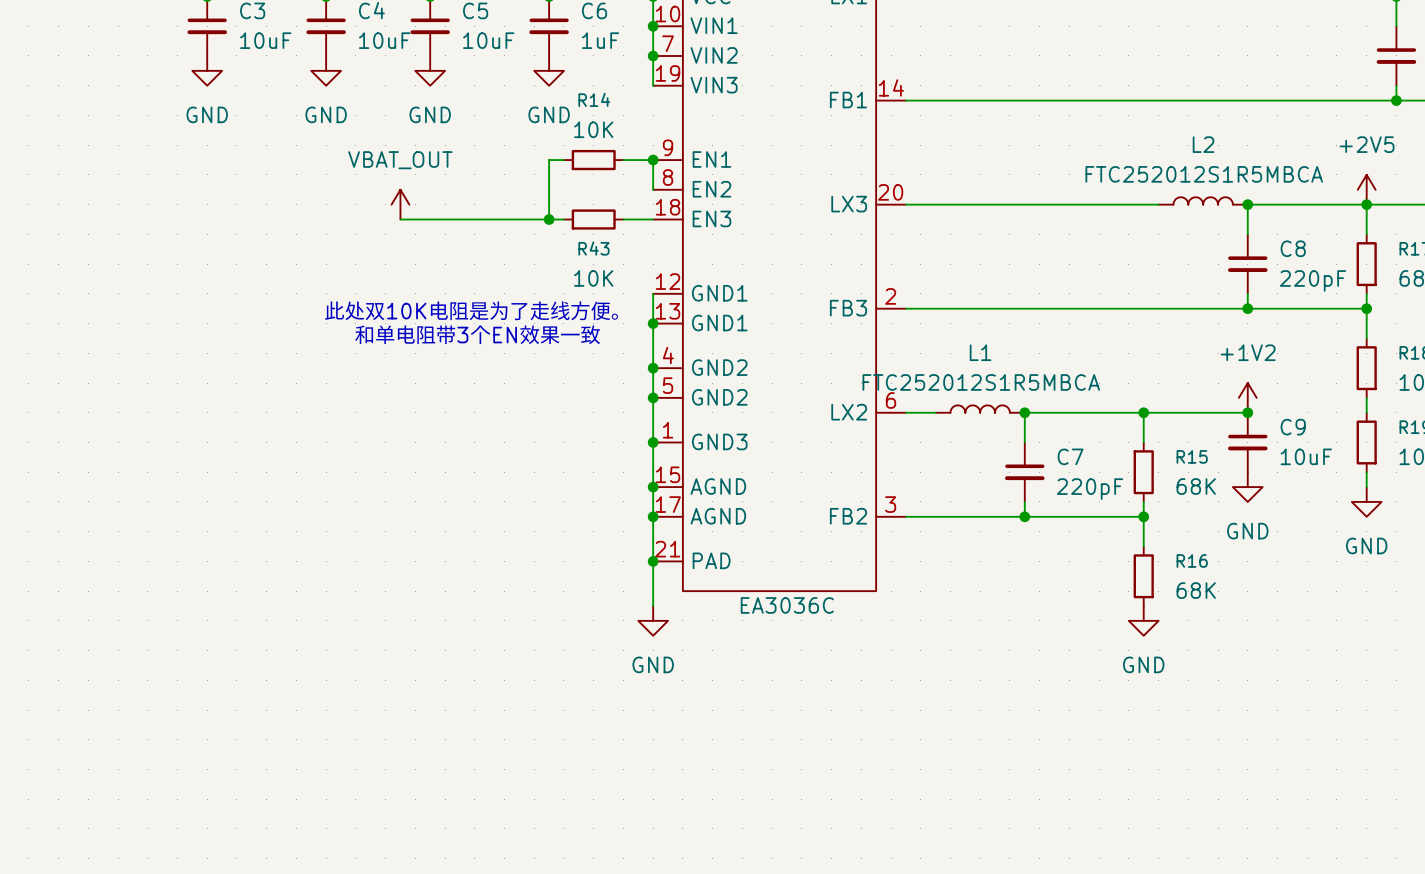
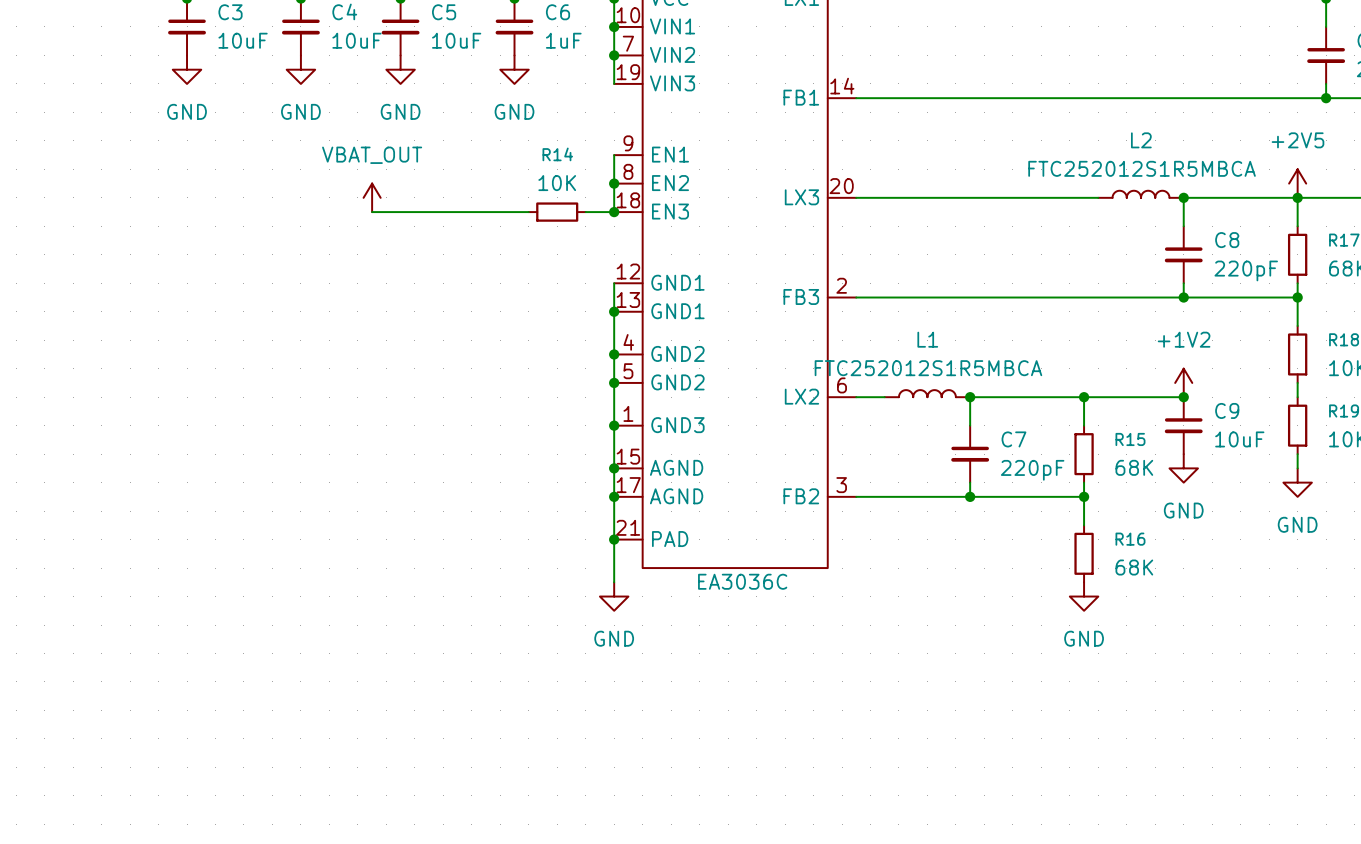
wire: (563, 160) (549, 160) (549, 219) -> none
R14: 10K (593, 160) -> none
wire: (623, 160) (653, 160) -> none
junction: (653, 160) -> none
wire: none -> (614, 183) (614, 212)
junction: none -> (614, 183)
junction: (549, 219) -> none
junction: none -> (614, 212)
R43 name: R43 (593, 248) -> R14 (557, 154)
R43 value position: 10K (593, 278) -> 10K (557, 183)
text: 此处双10K电阻是为了走线方便。 (471, 310) -> none
text: 和单电阻带3个EN效果一致 (477, 334) -> none

